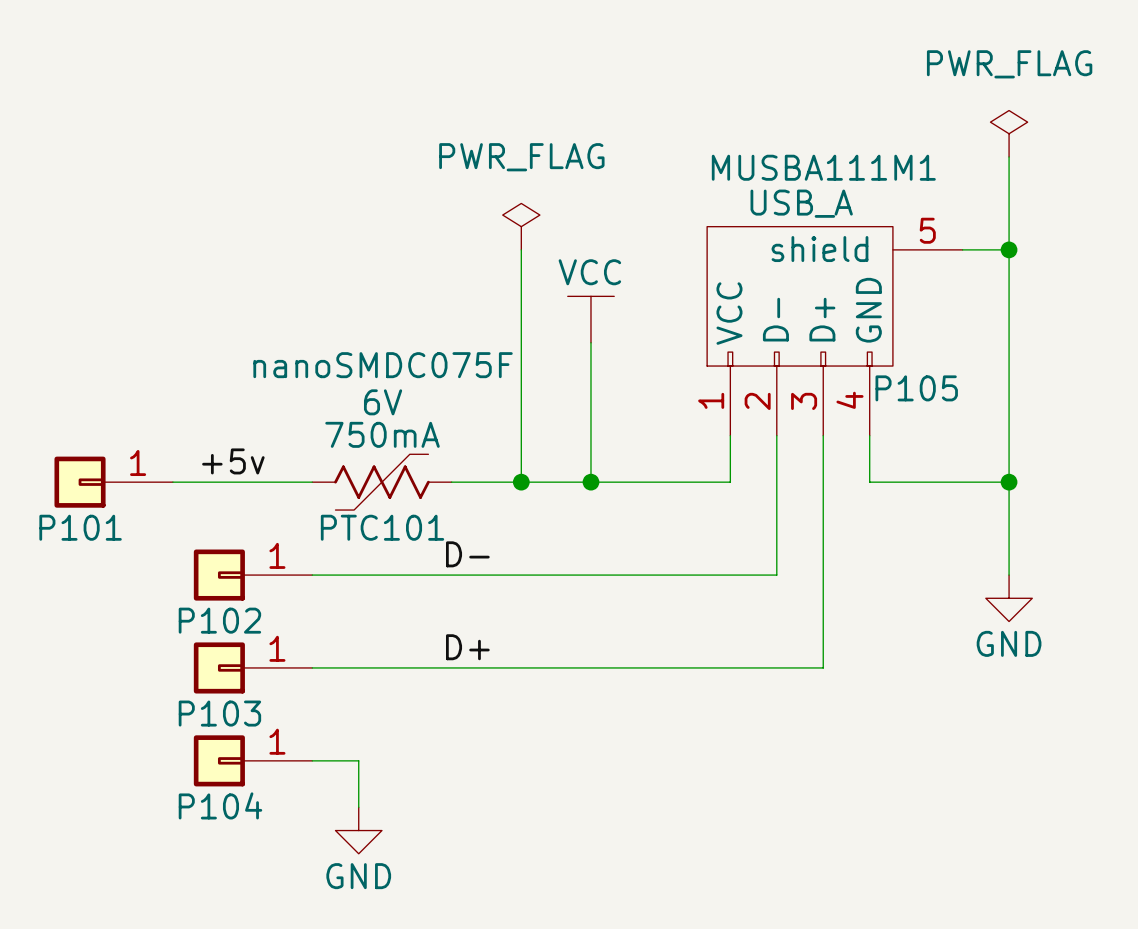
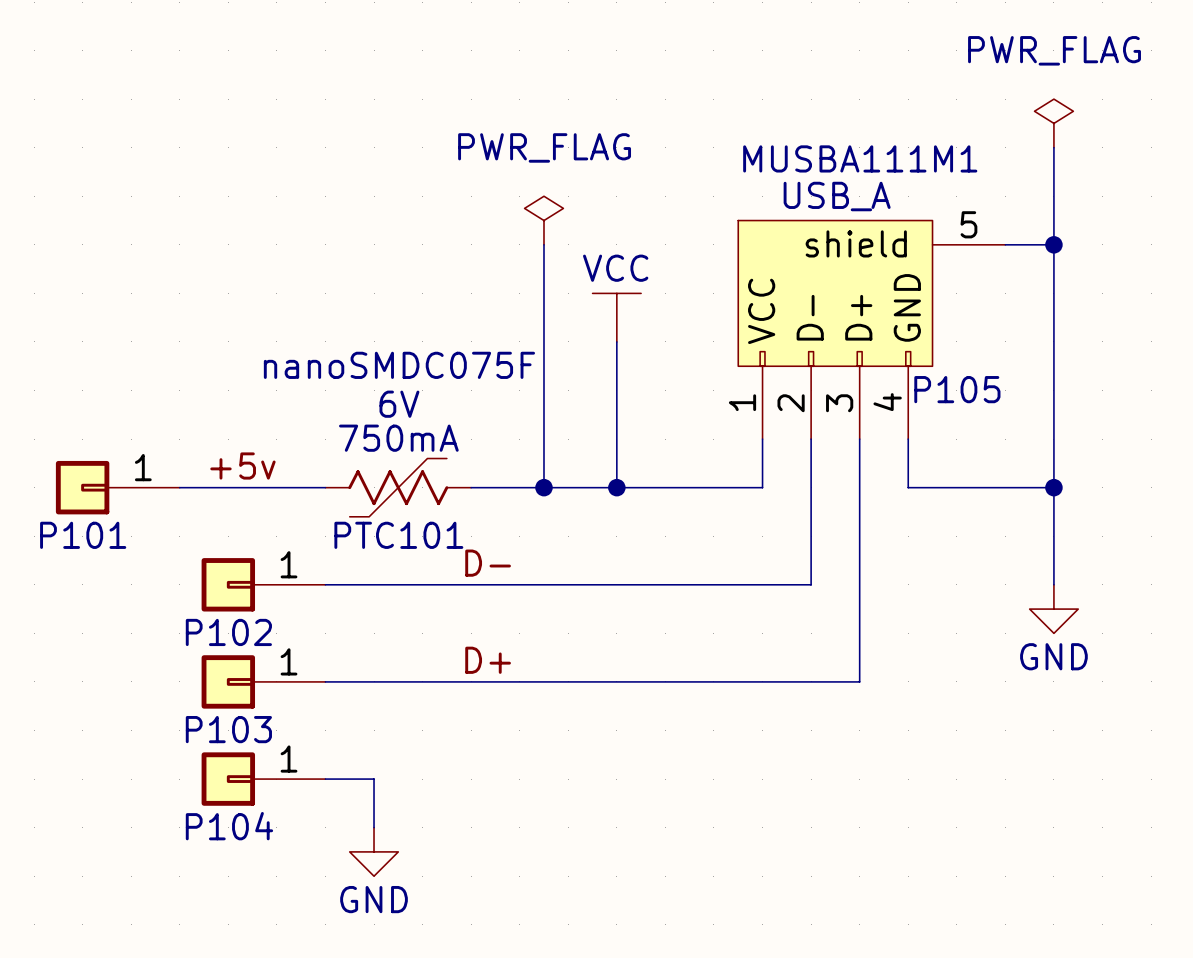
P105 symbol: [707, 226, 963, 436] -> [738, 220, 1006, 440]

